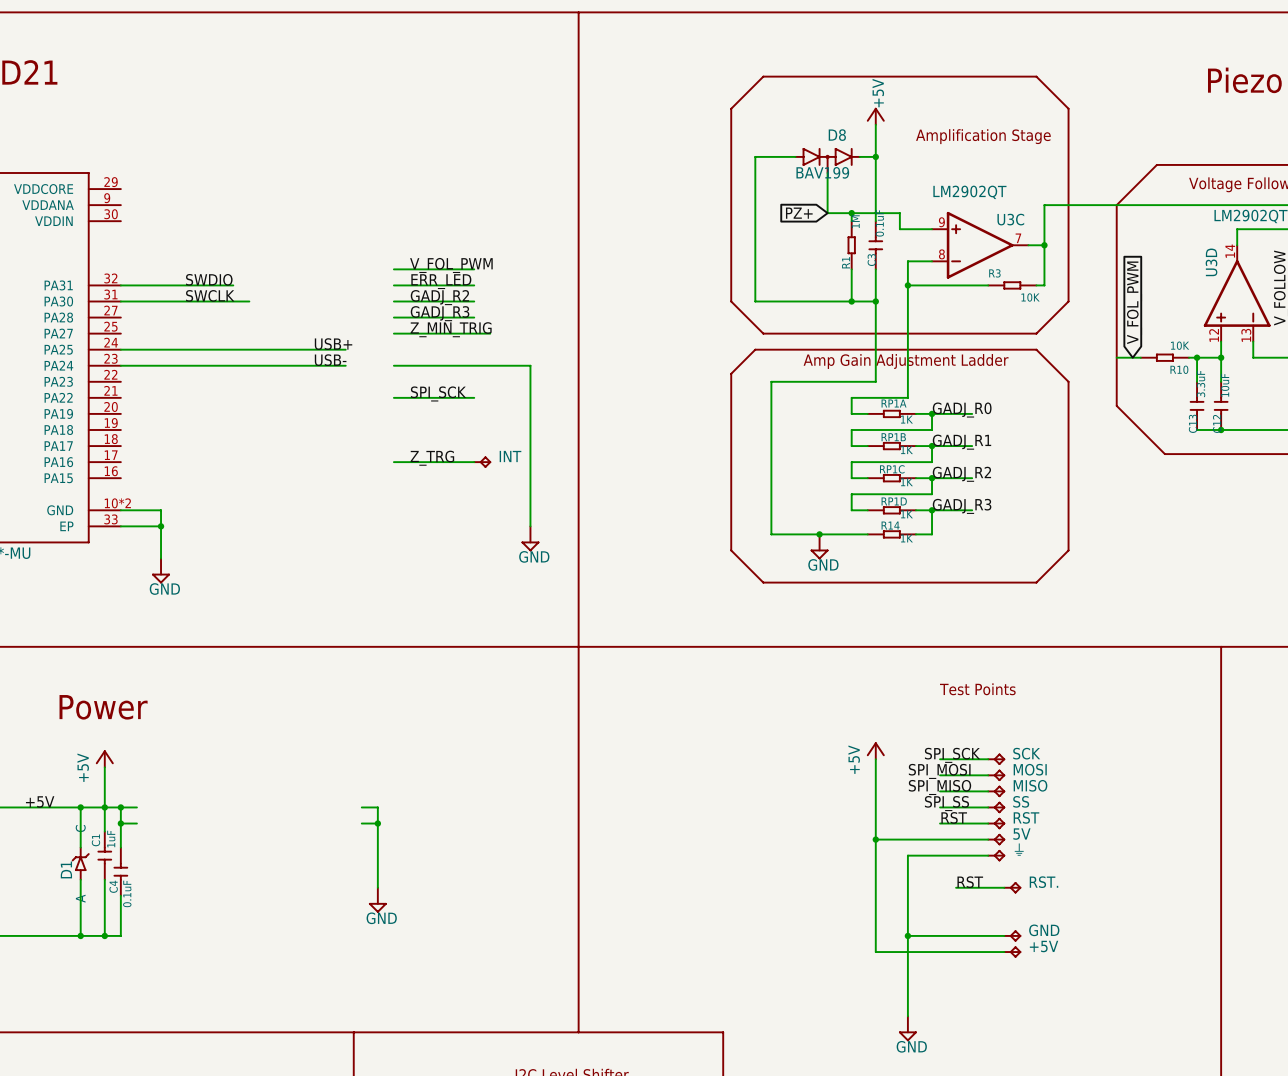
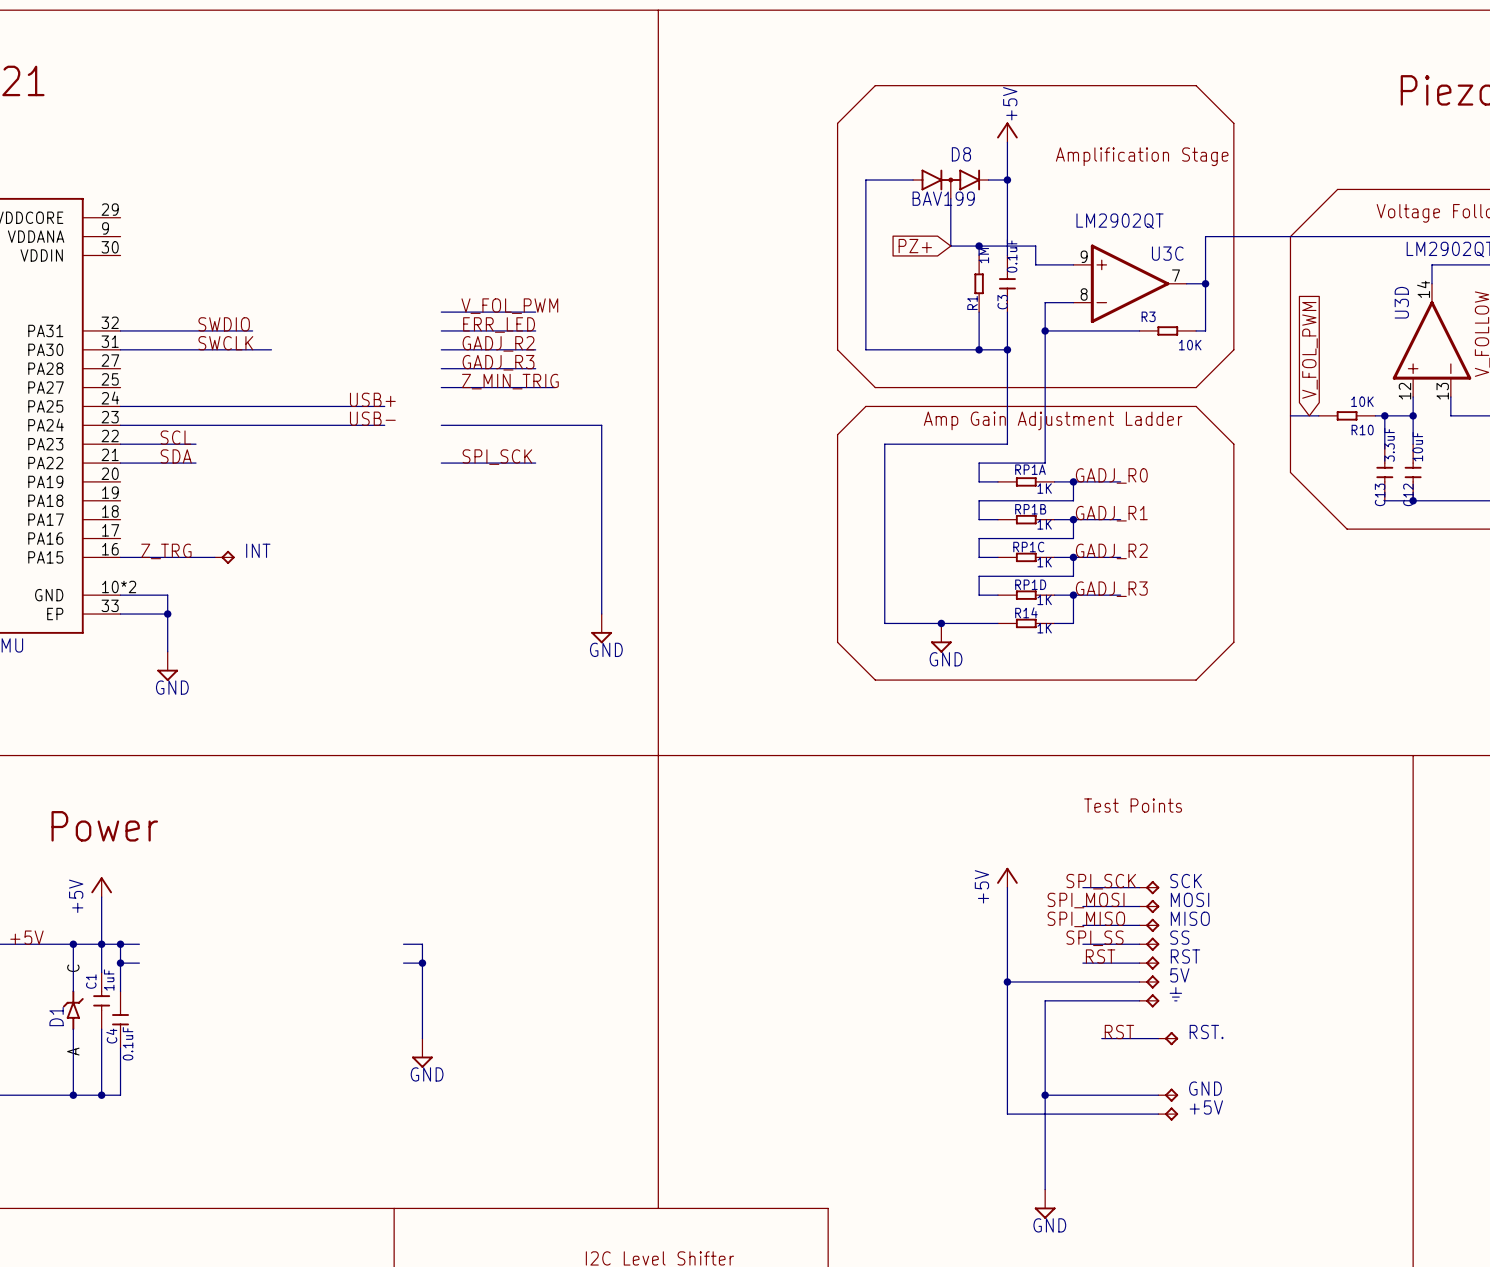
label: none -> SCL (175, 437)
wire: none -> (120, 444) (196, 444)
label: none -> SDA (176, 456)
wire: none -> (120, 463) (196, 463)
label: Z_TRG (432, 458) -> none
wire: (393, 462) (474, 462) -> none
INT: (482, 462) -> none
label: none -> Z_TRG (166, 551)
wire: none -> (120, 557) (214, 557)
INT: none -> (224, 557)

